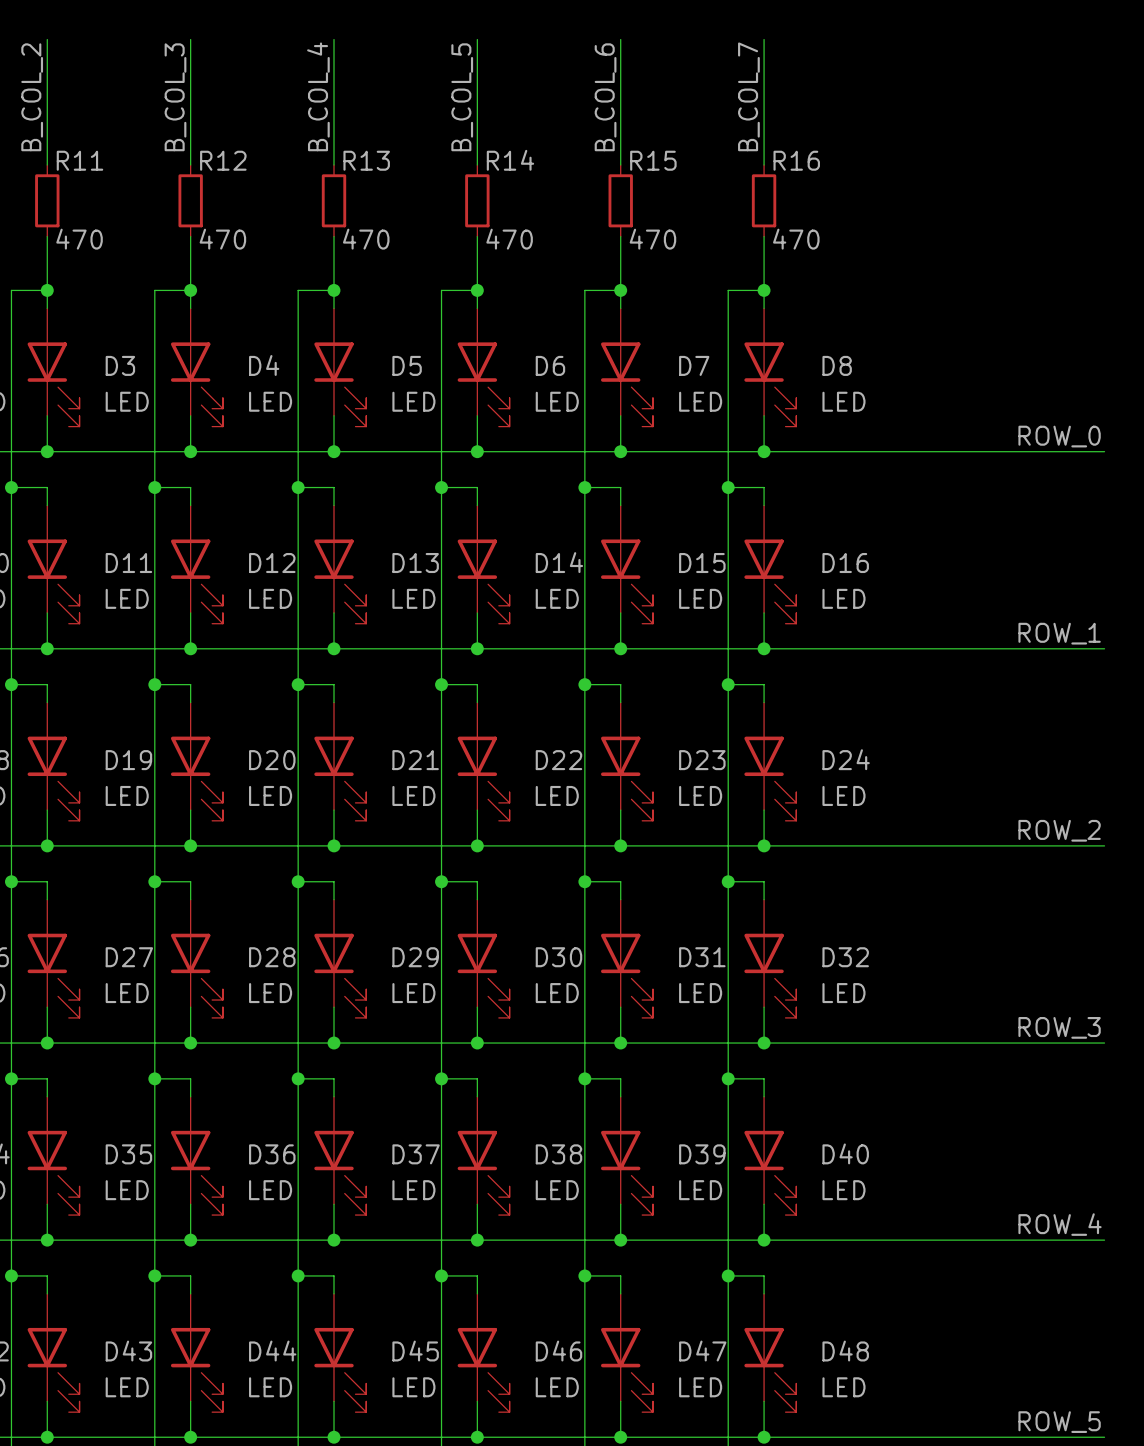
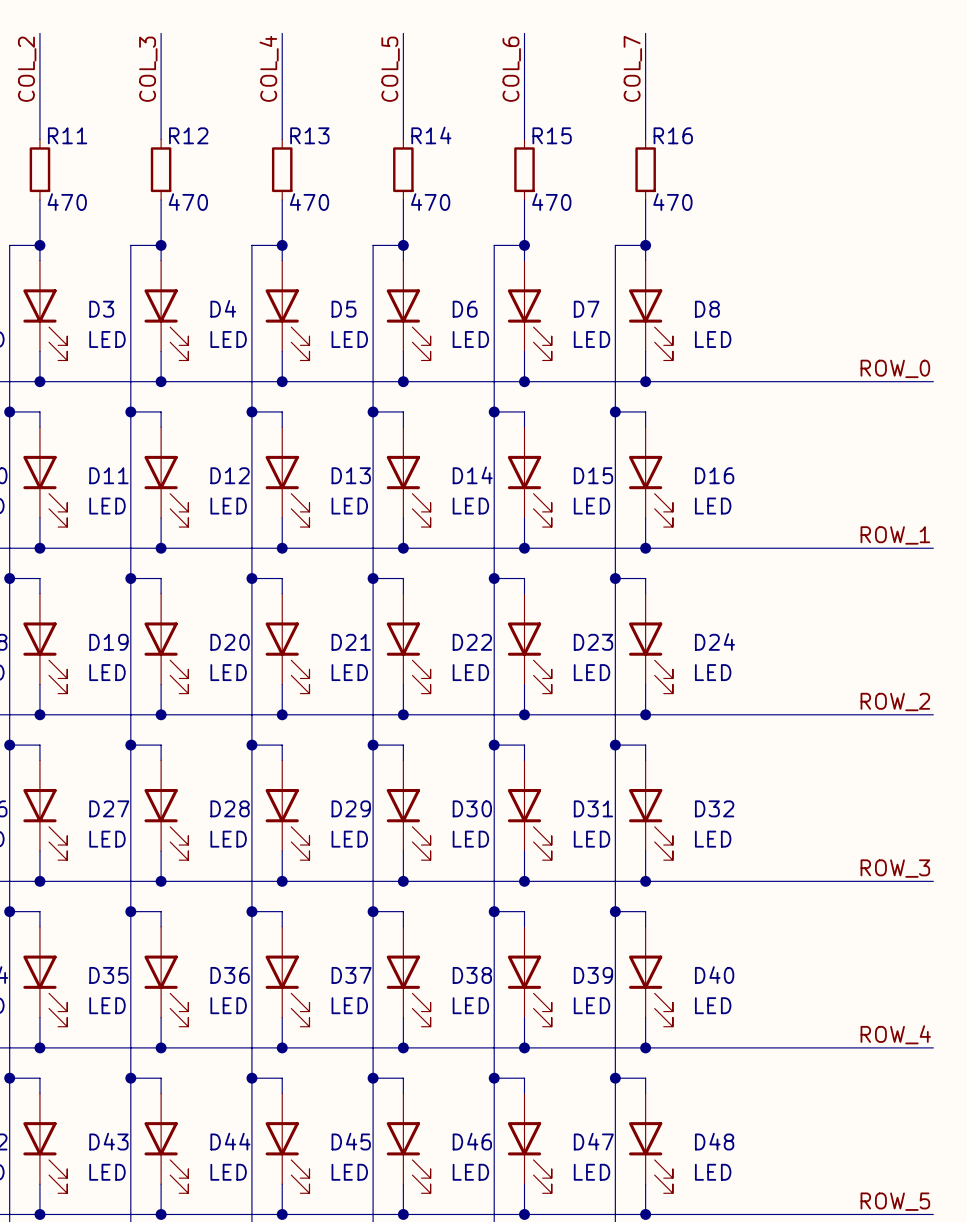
label: B_COL_4 (318, 96) -> COL_4 (269, 68)
label: B_COL_7 (748, 96) -> COL_7 (632, 68)
label: B_COL_2 (32, 97) -> COL_2 (27, 69)
label: B_COL_3 (175, 97) -> COL_3 (148, 69)
label: B_COL_5 (462, 97) -> COL_5 (390, 69)
label: B_COL_6 (605, 97) -> COL_6 (511, 69)

